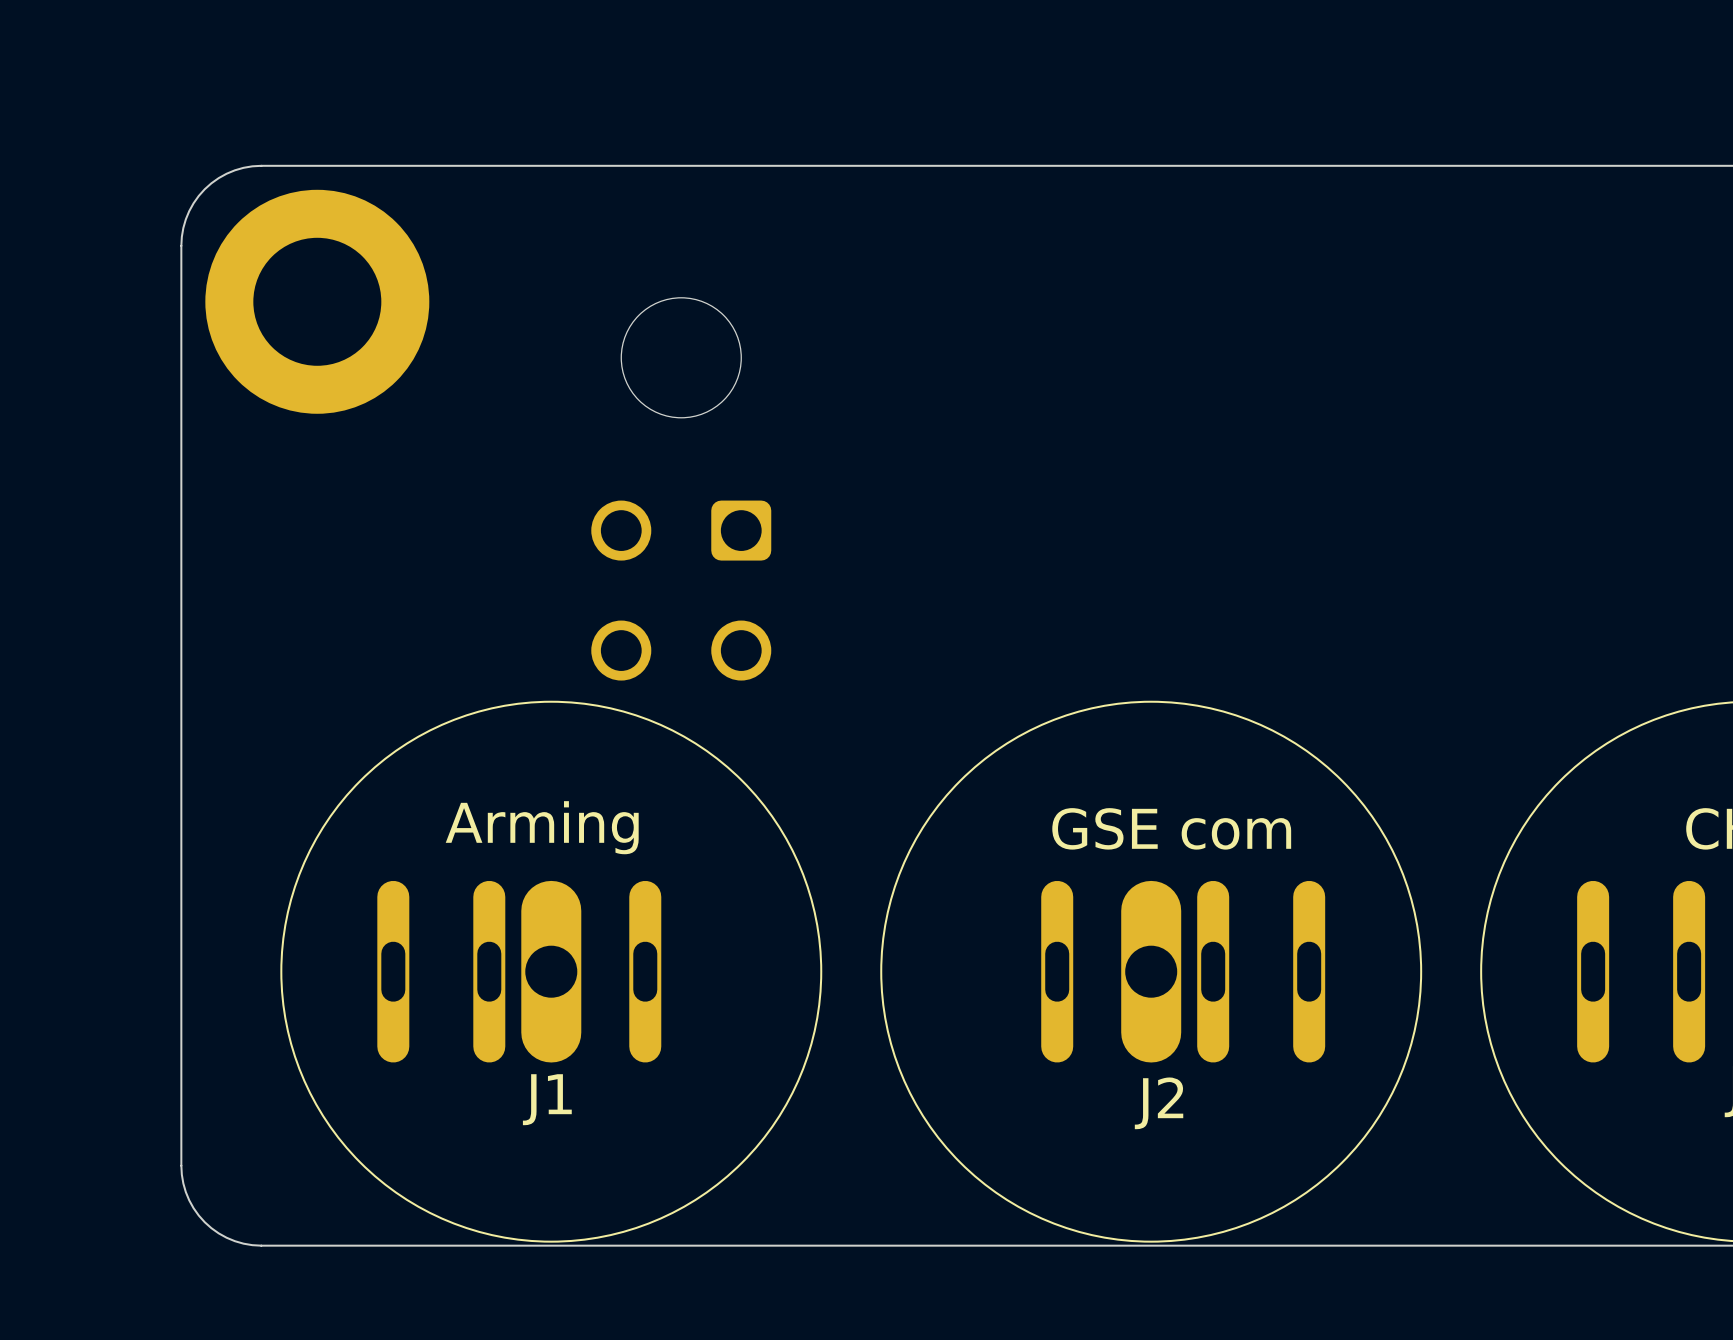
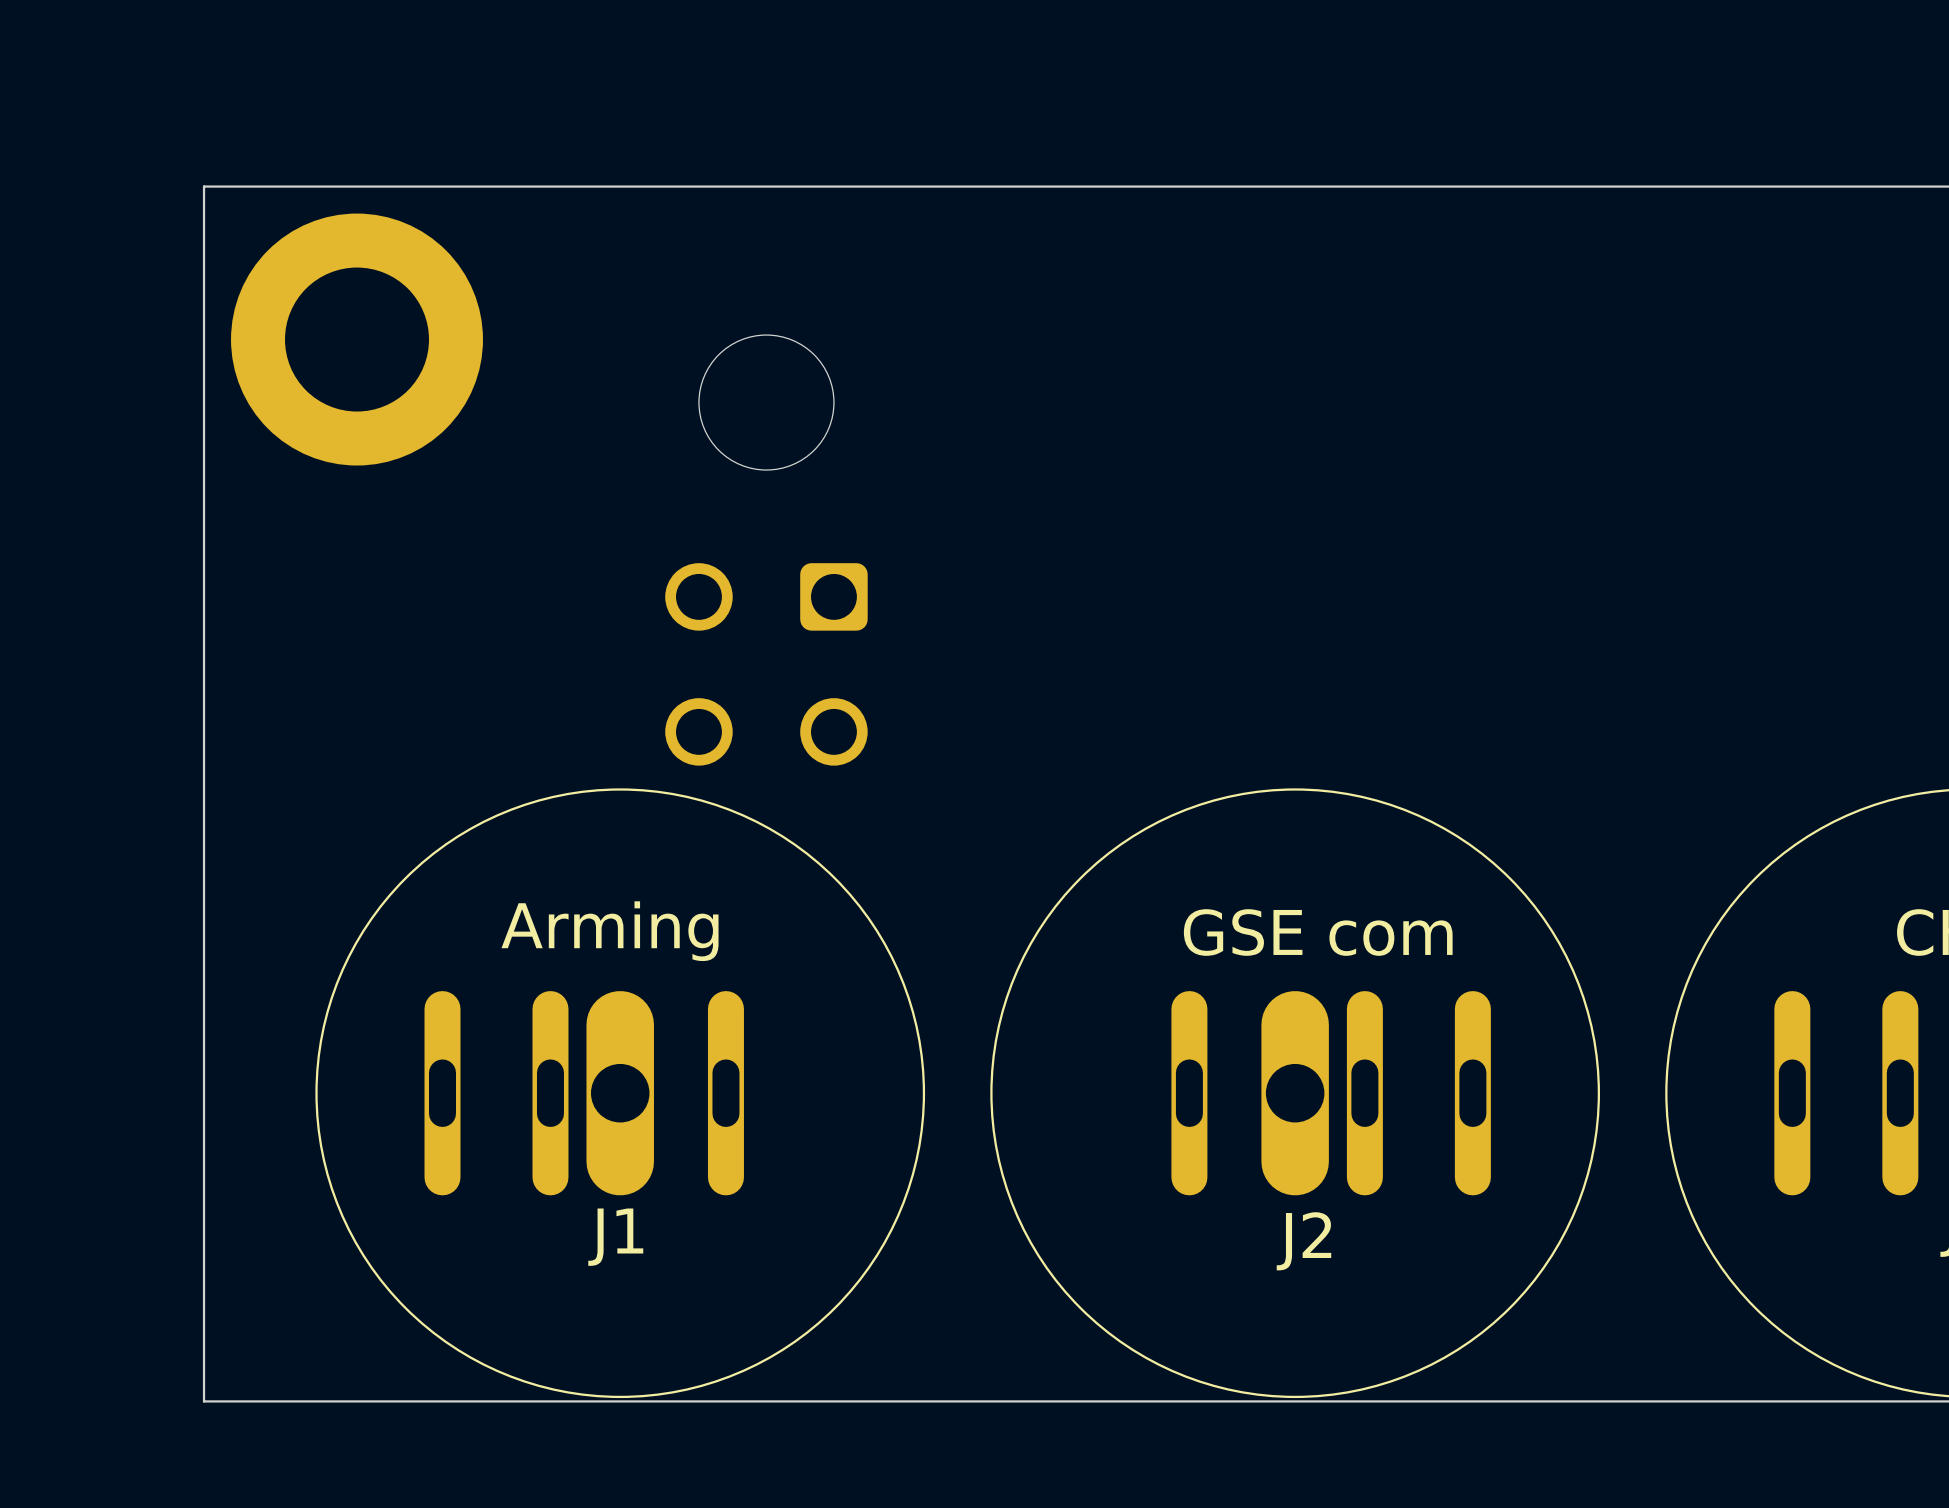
board edge: (261, 165) (243, 167) (226, 173) (204, 189) (193, 203) (185, 219) (181, 245) -> (294, 186) (204, 186) (204, 276)
board edge: (181, 1165) (185, 1192) (193, 1208) (204, 1222) (226, 1237) (243, 1243) (261, 1245) -> (204, 1311) (204, 1401) (294, 1401)

